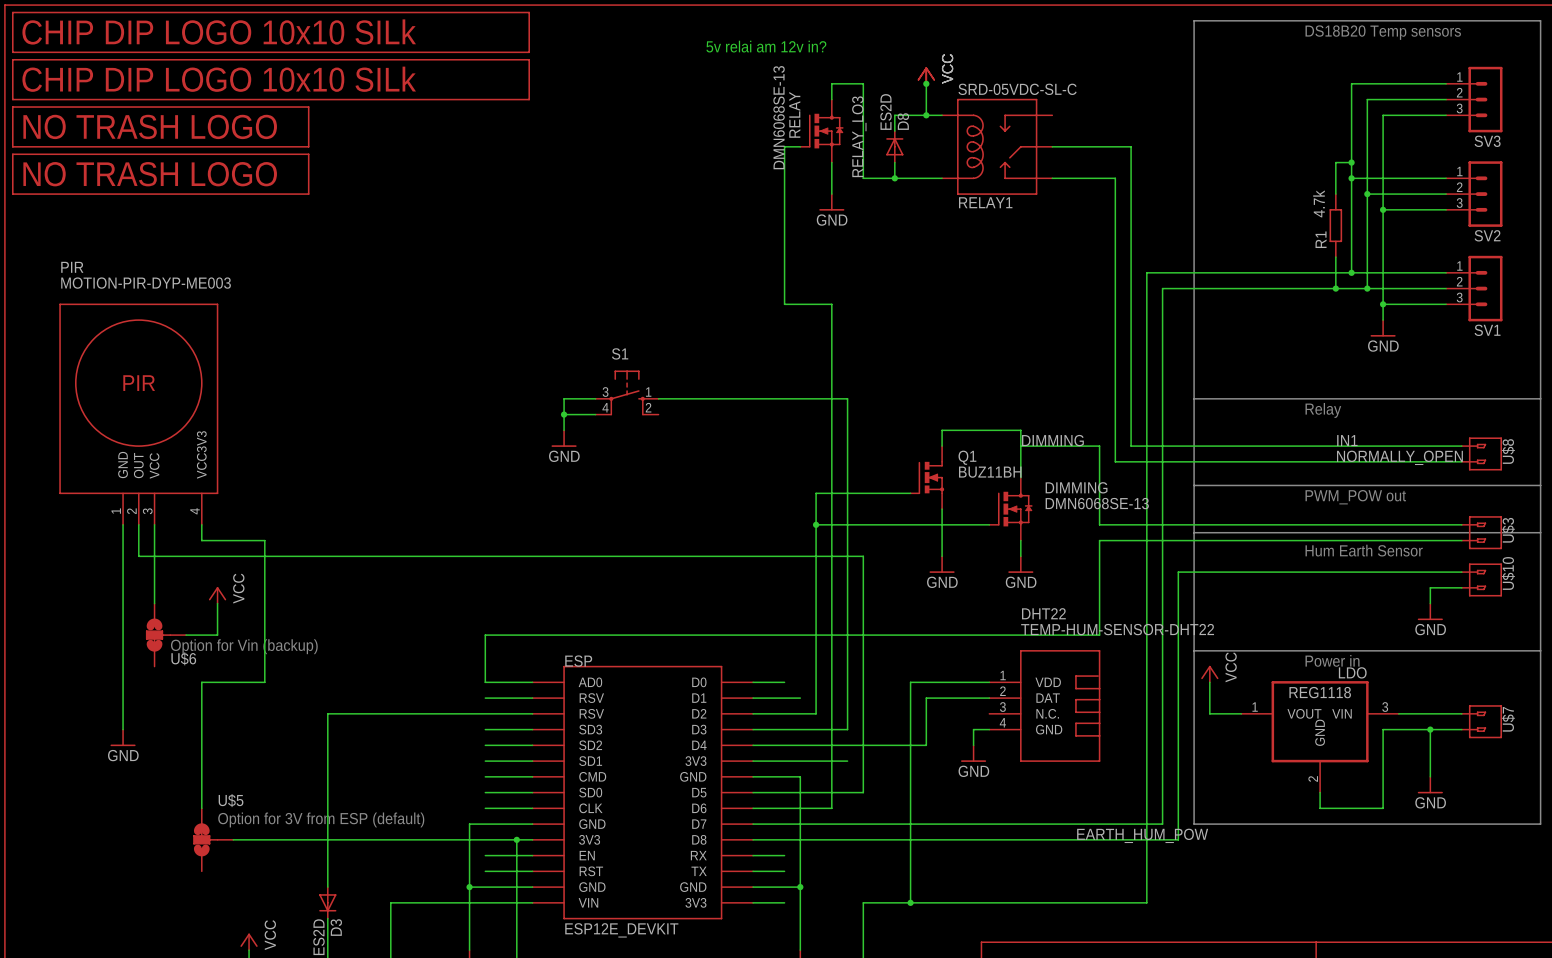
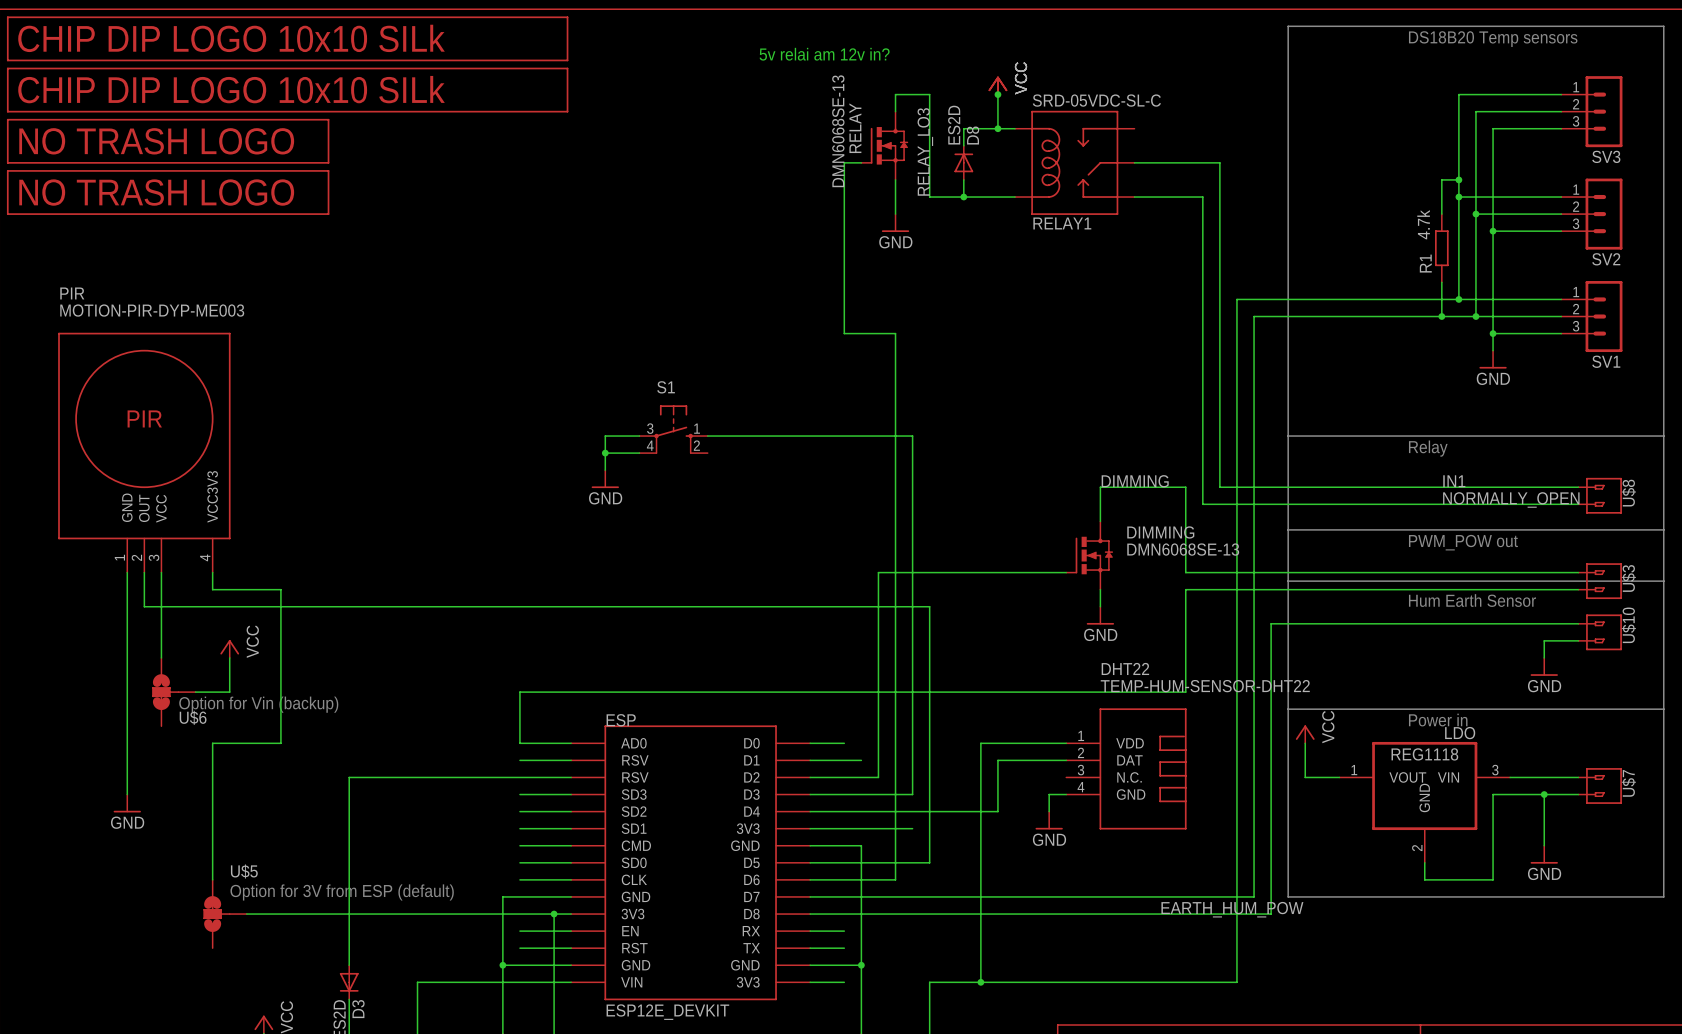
wire: (942, 446) (942, 430) (1020, 430) (1020, 446) -> none
Q1: BUZ11BH (927, 477) -> none
wire: (910, 493) (816, 493) (816, 524) -> none
wire: (942, 509) (942, 556) -> none
junction: (816, 524) -> none
power symbol: GND (942, 564) -> none

